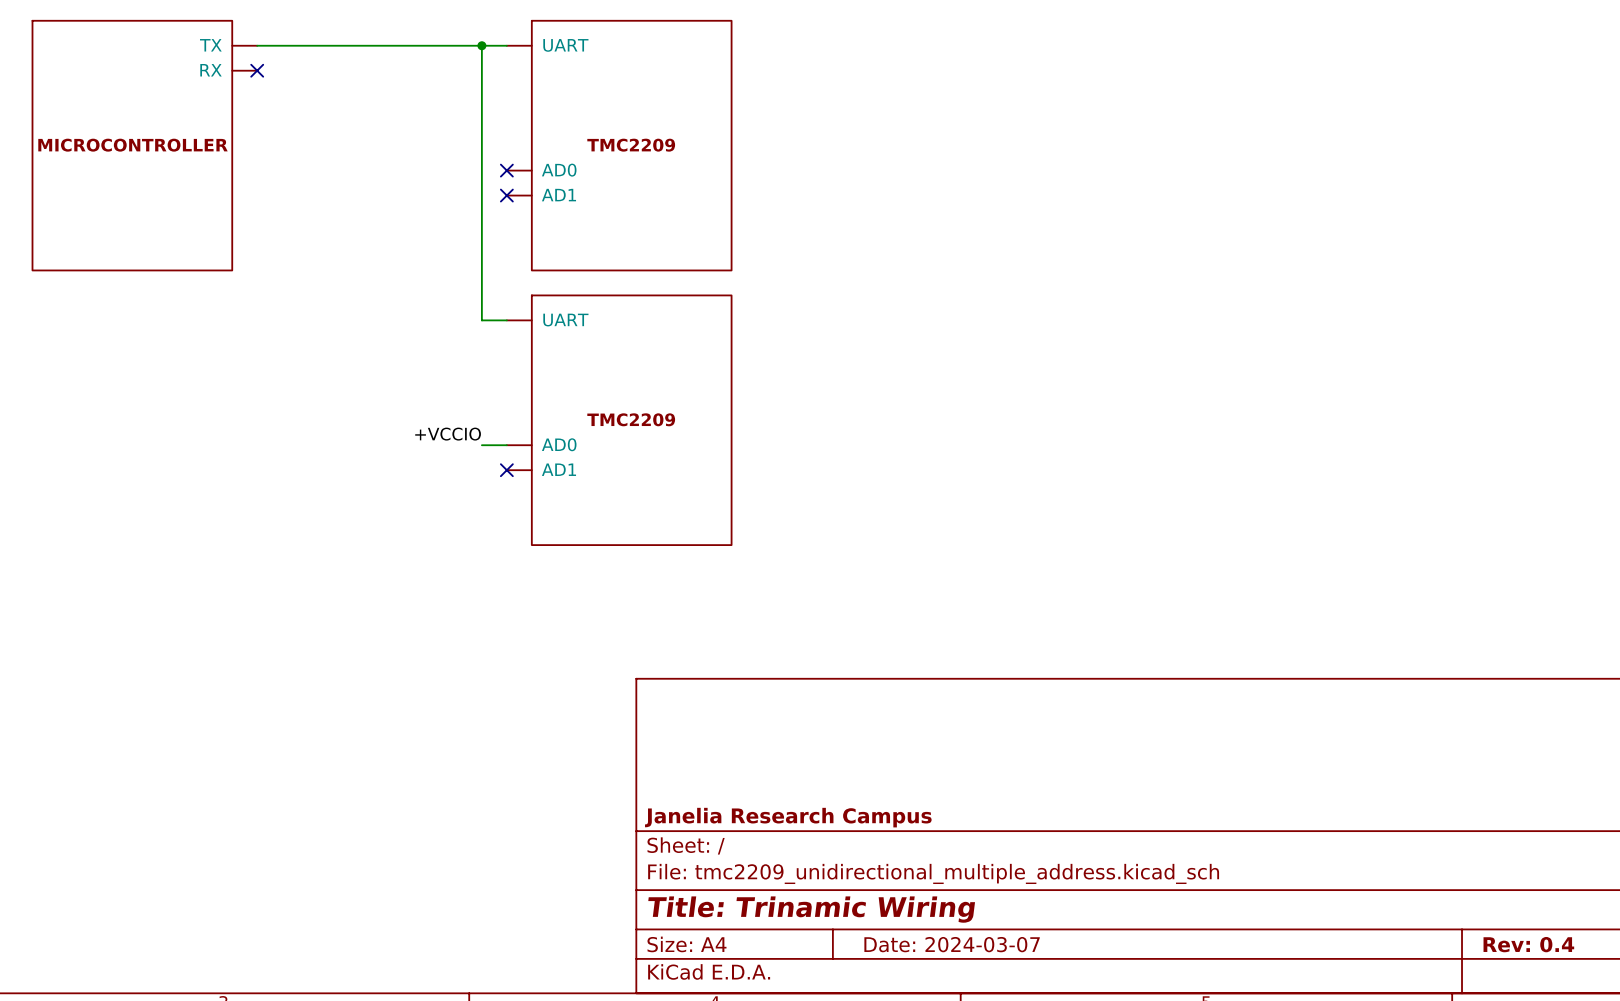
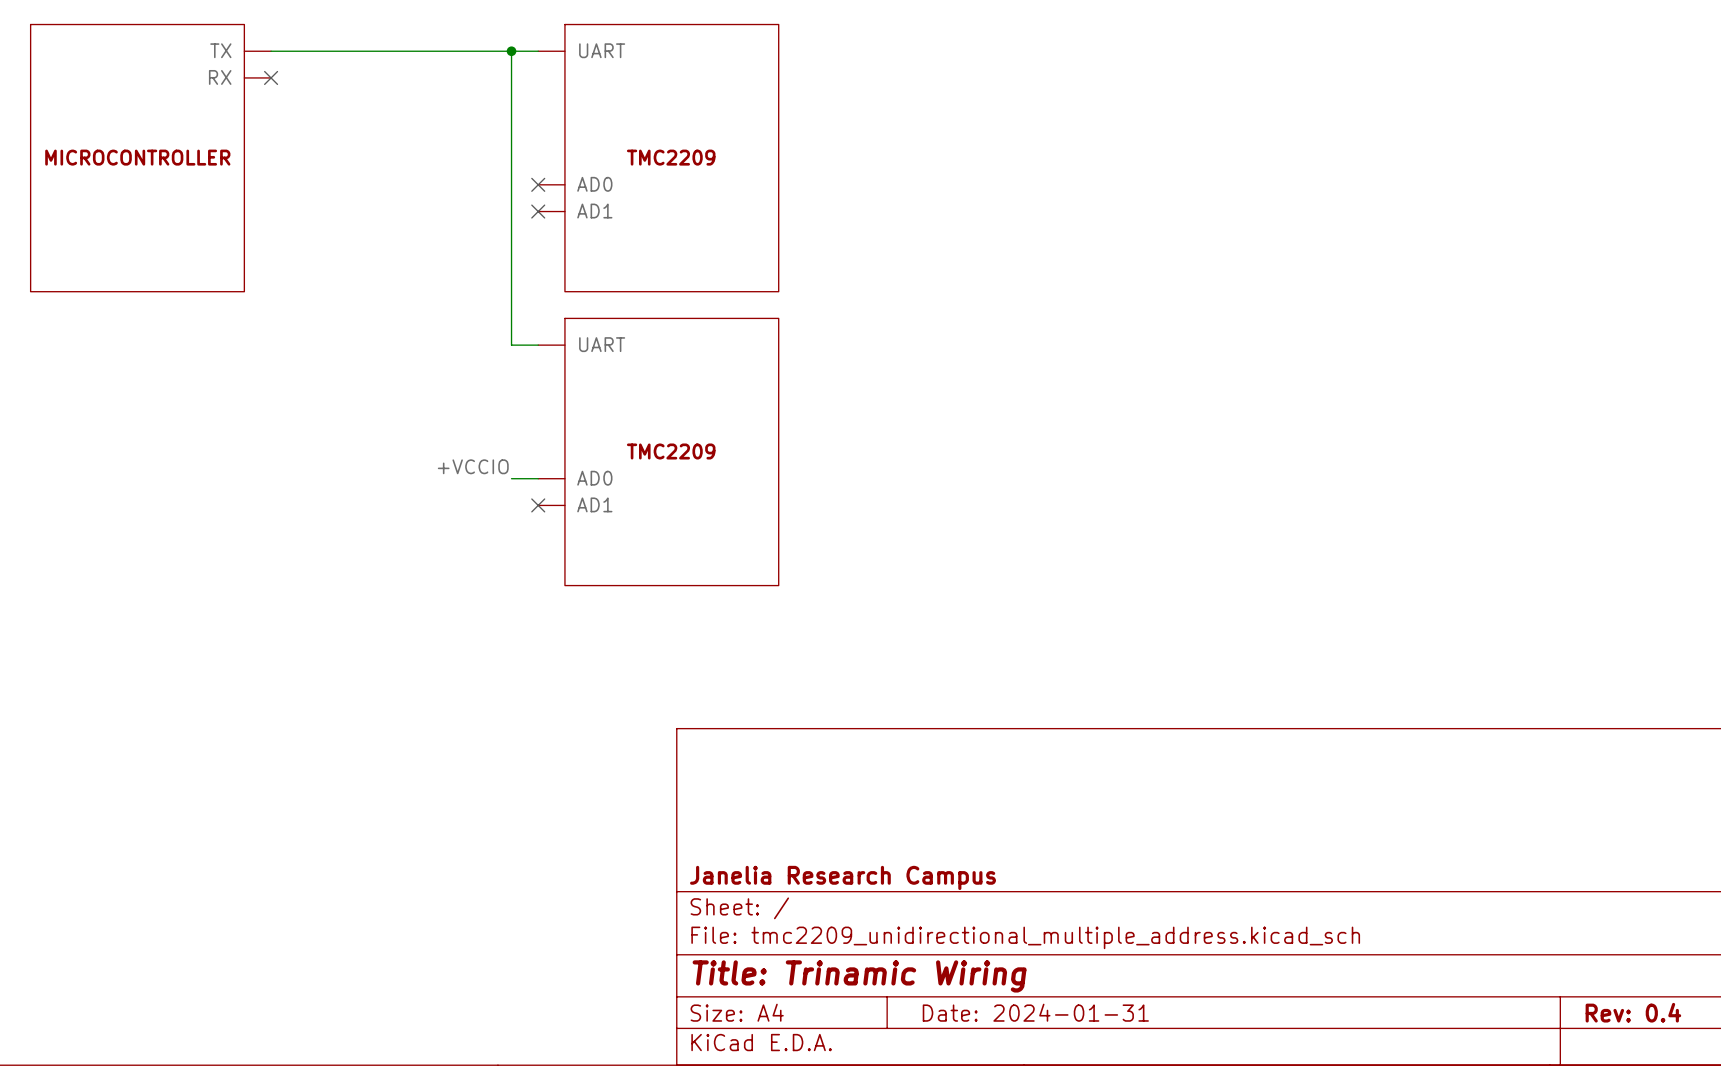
title block: Date: 2024-03-07 (952, 944) -> Date: 2024-01-31 (1035, 1012)

